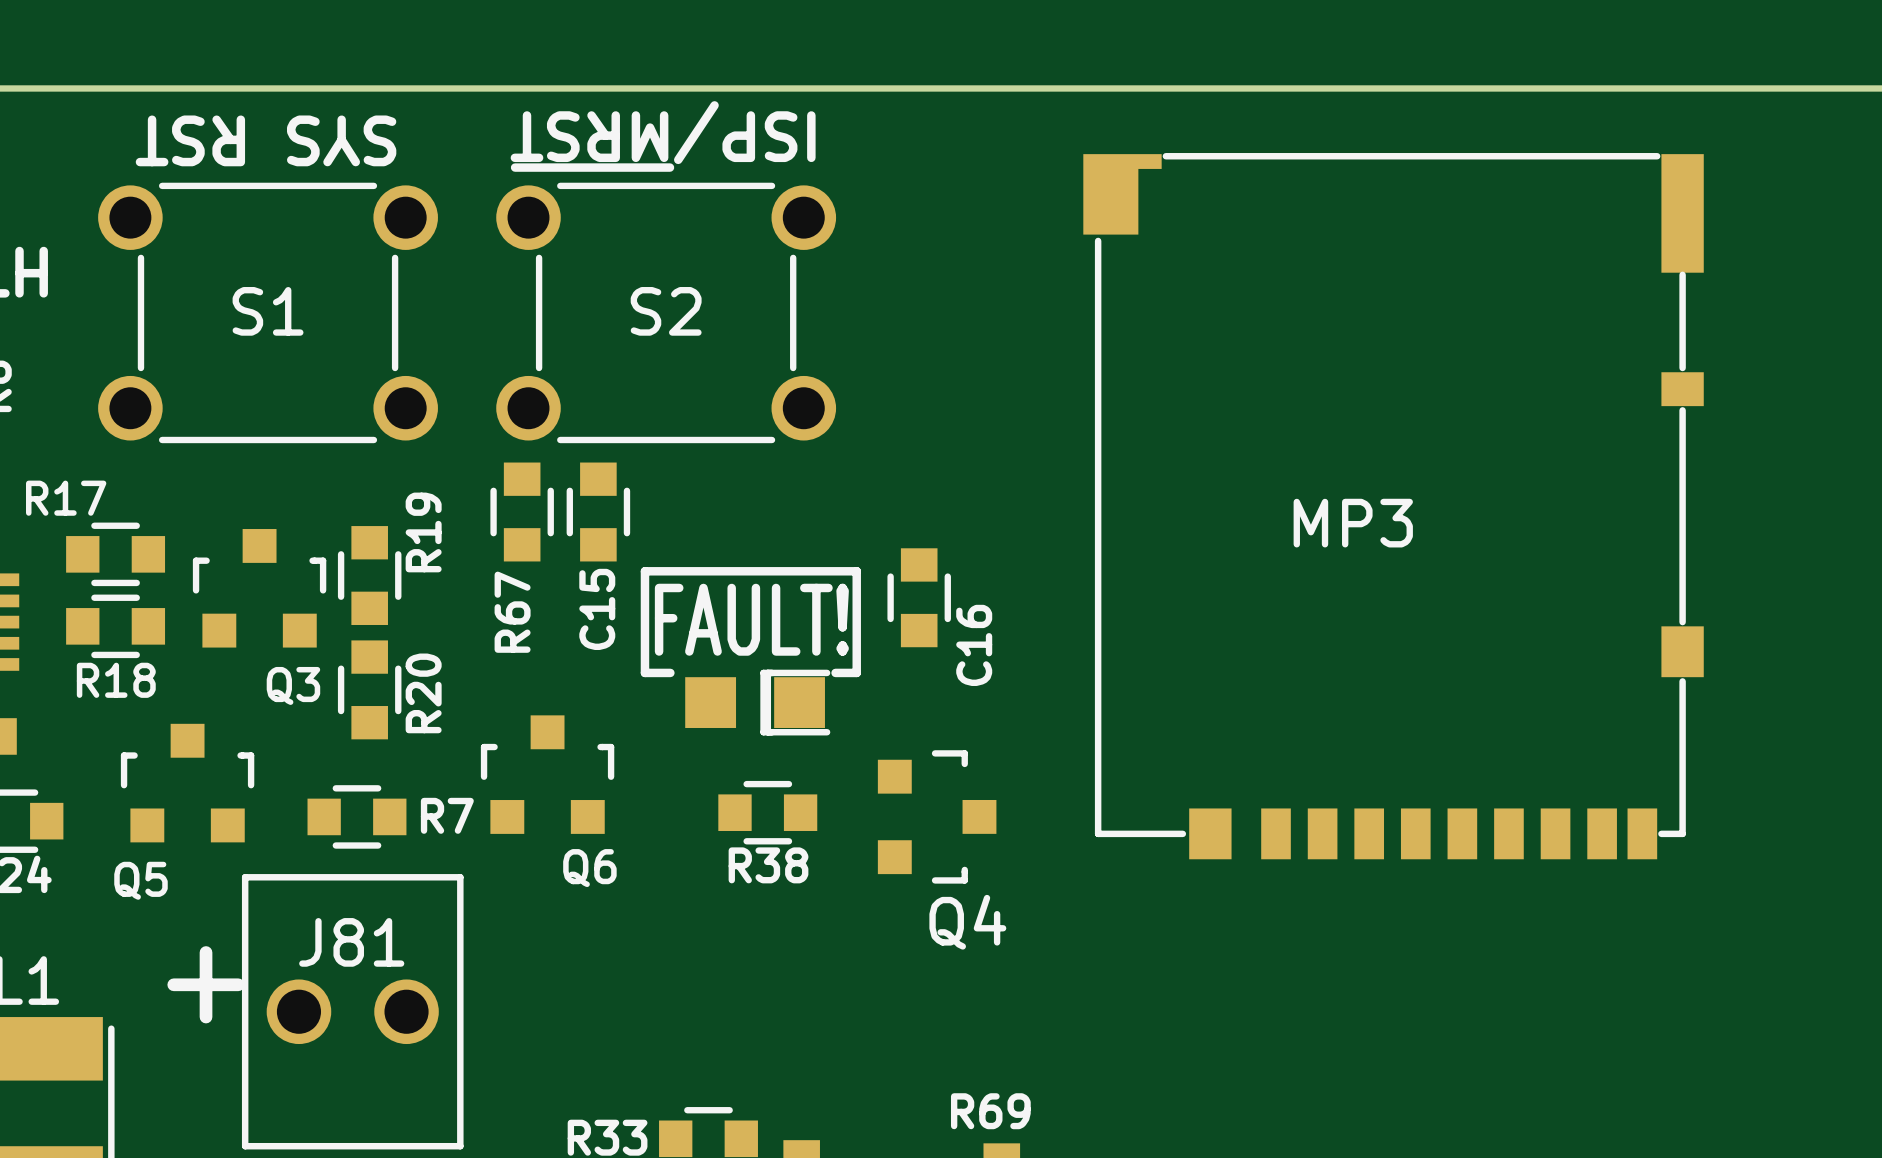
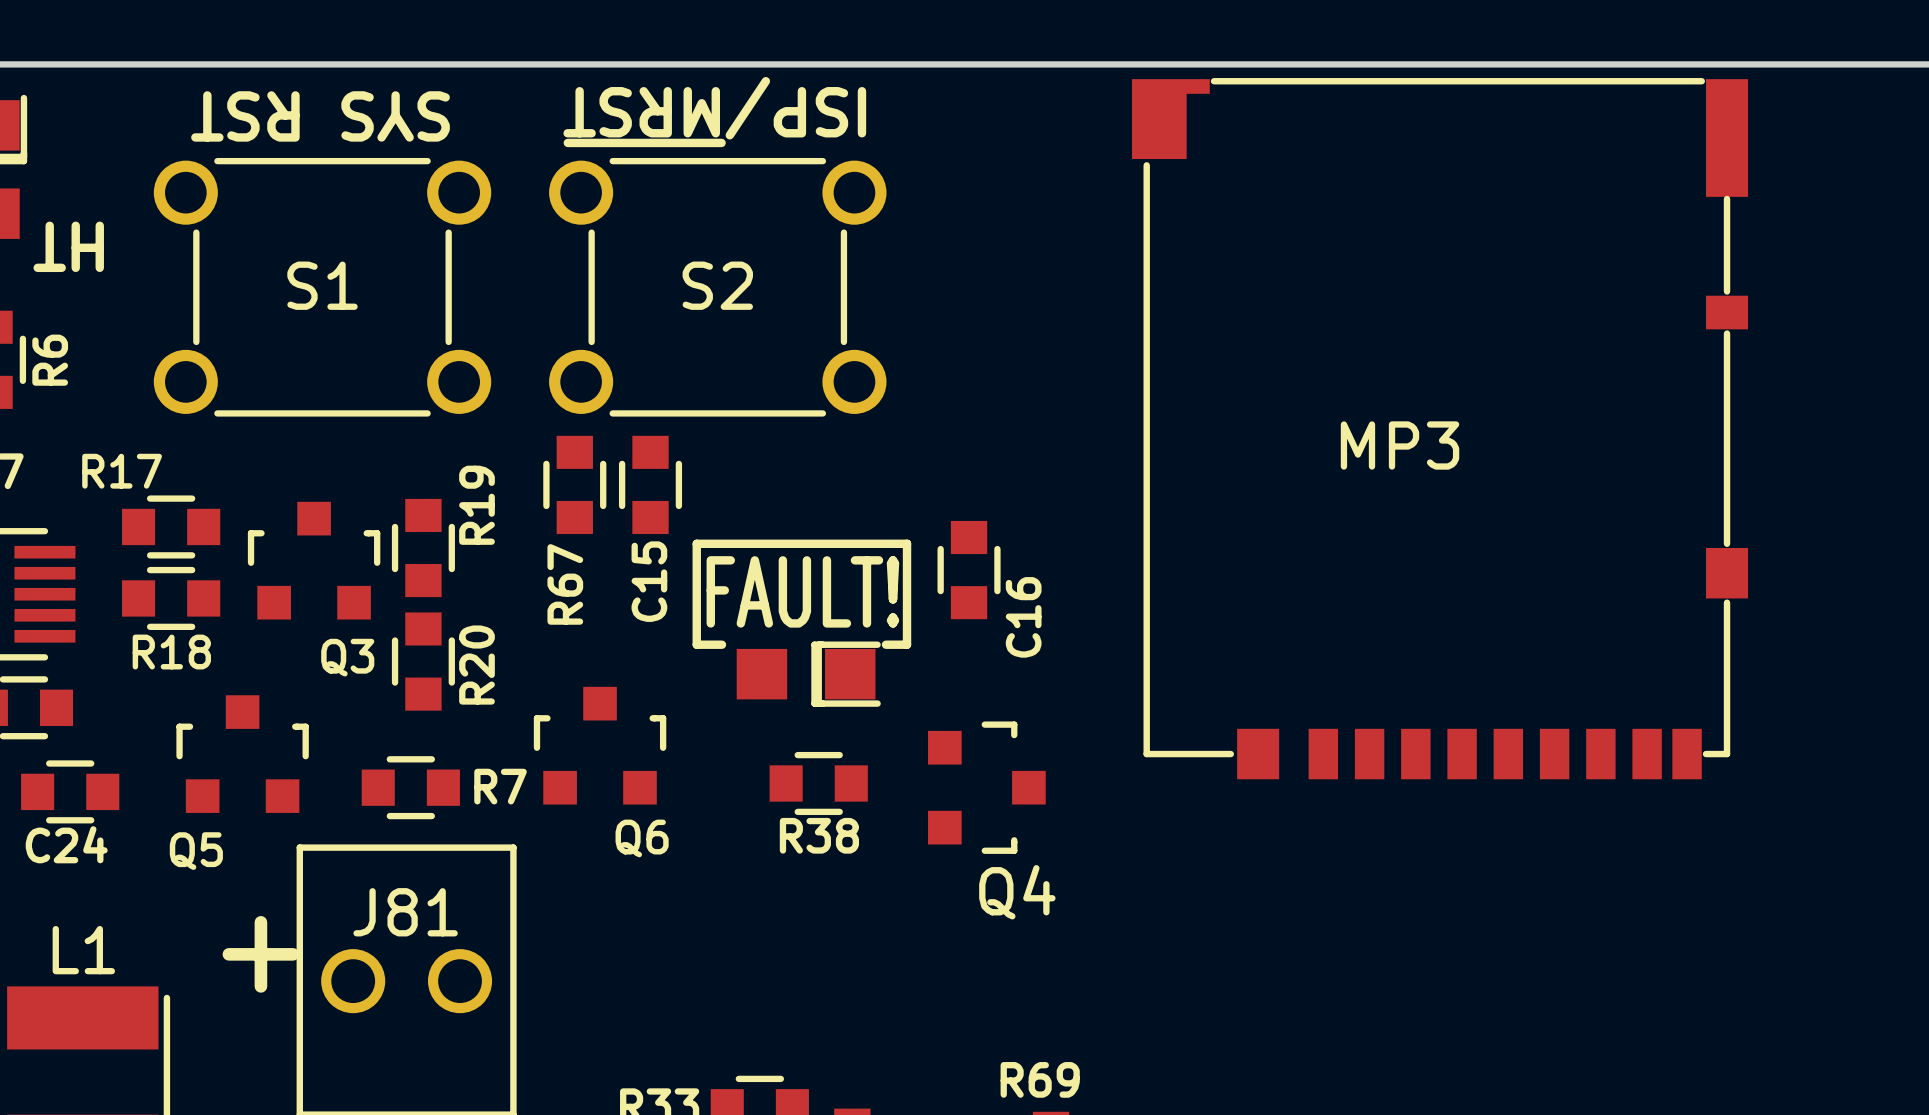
MP3 position: (1393, 506) -> (1440, 428)

